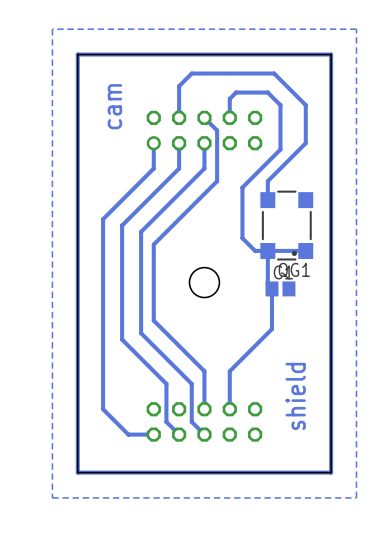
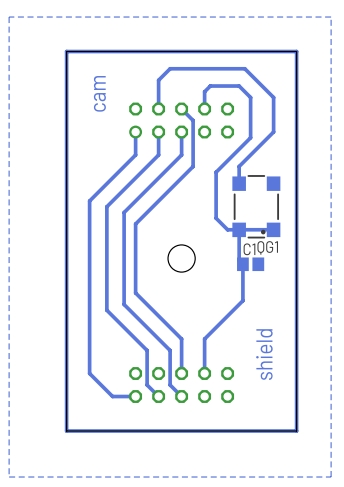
bottom zone outline: (356, 29) (52, 29) (52, 497) (356, 497) (356, 29) -> (331, 17) (331, 477) (9, 477) (9, 17) (331, 17)

